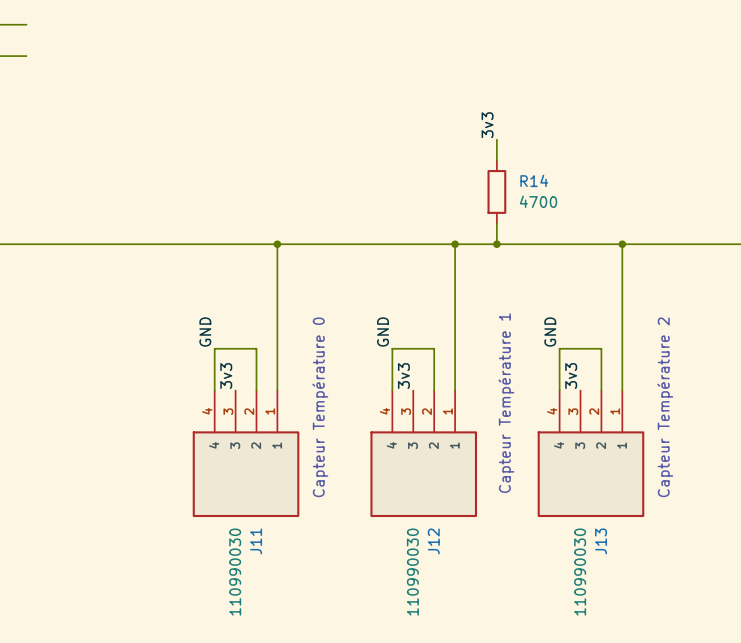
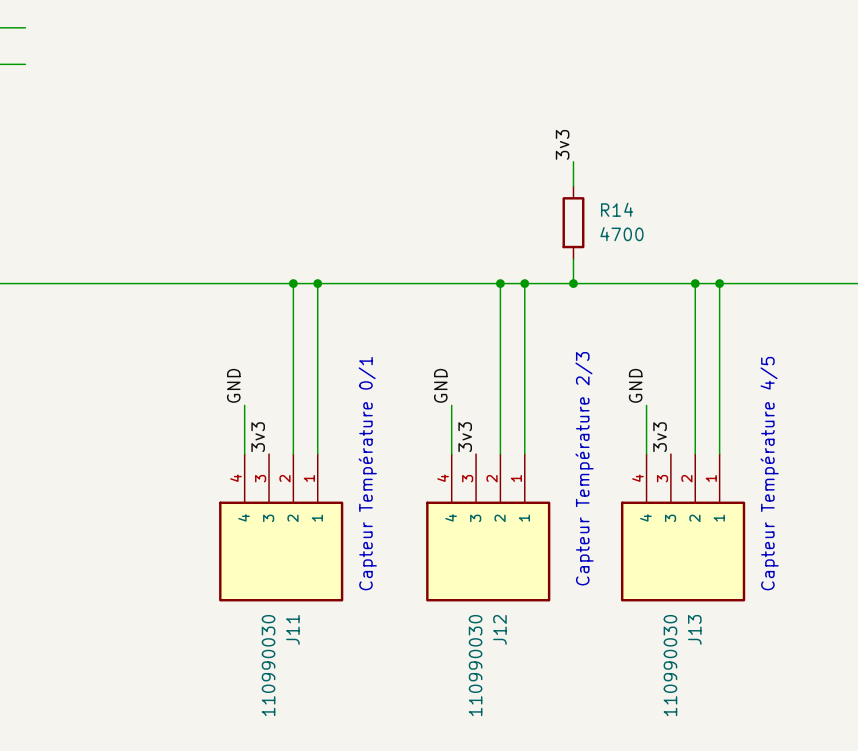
junction: none -> (293, 283)
junction: none -> (500, 283)
junction: none -> (695, 283)
wire: (214, 348) (256, 348) -> (293, 283) (293, 405)
wire: (392, 348) (434, 348) -> (500, 283) (500, 405)
wire: (559, 348) (601, 348) -> (695, 283) (695, 405)
text: Capteur Température 1 (506, 403) -> Capteur Température 2/3 (584, 468)
text: Capteur Température 0 (320, 407) -> Capteur Température 0/1 (367, 473)
text: Capteur Température 2 (665, 407) -> Capteur Température 4/5 (769, 473)

